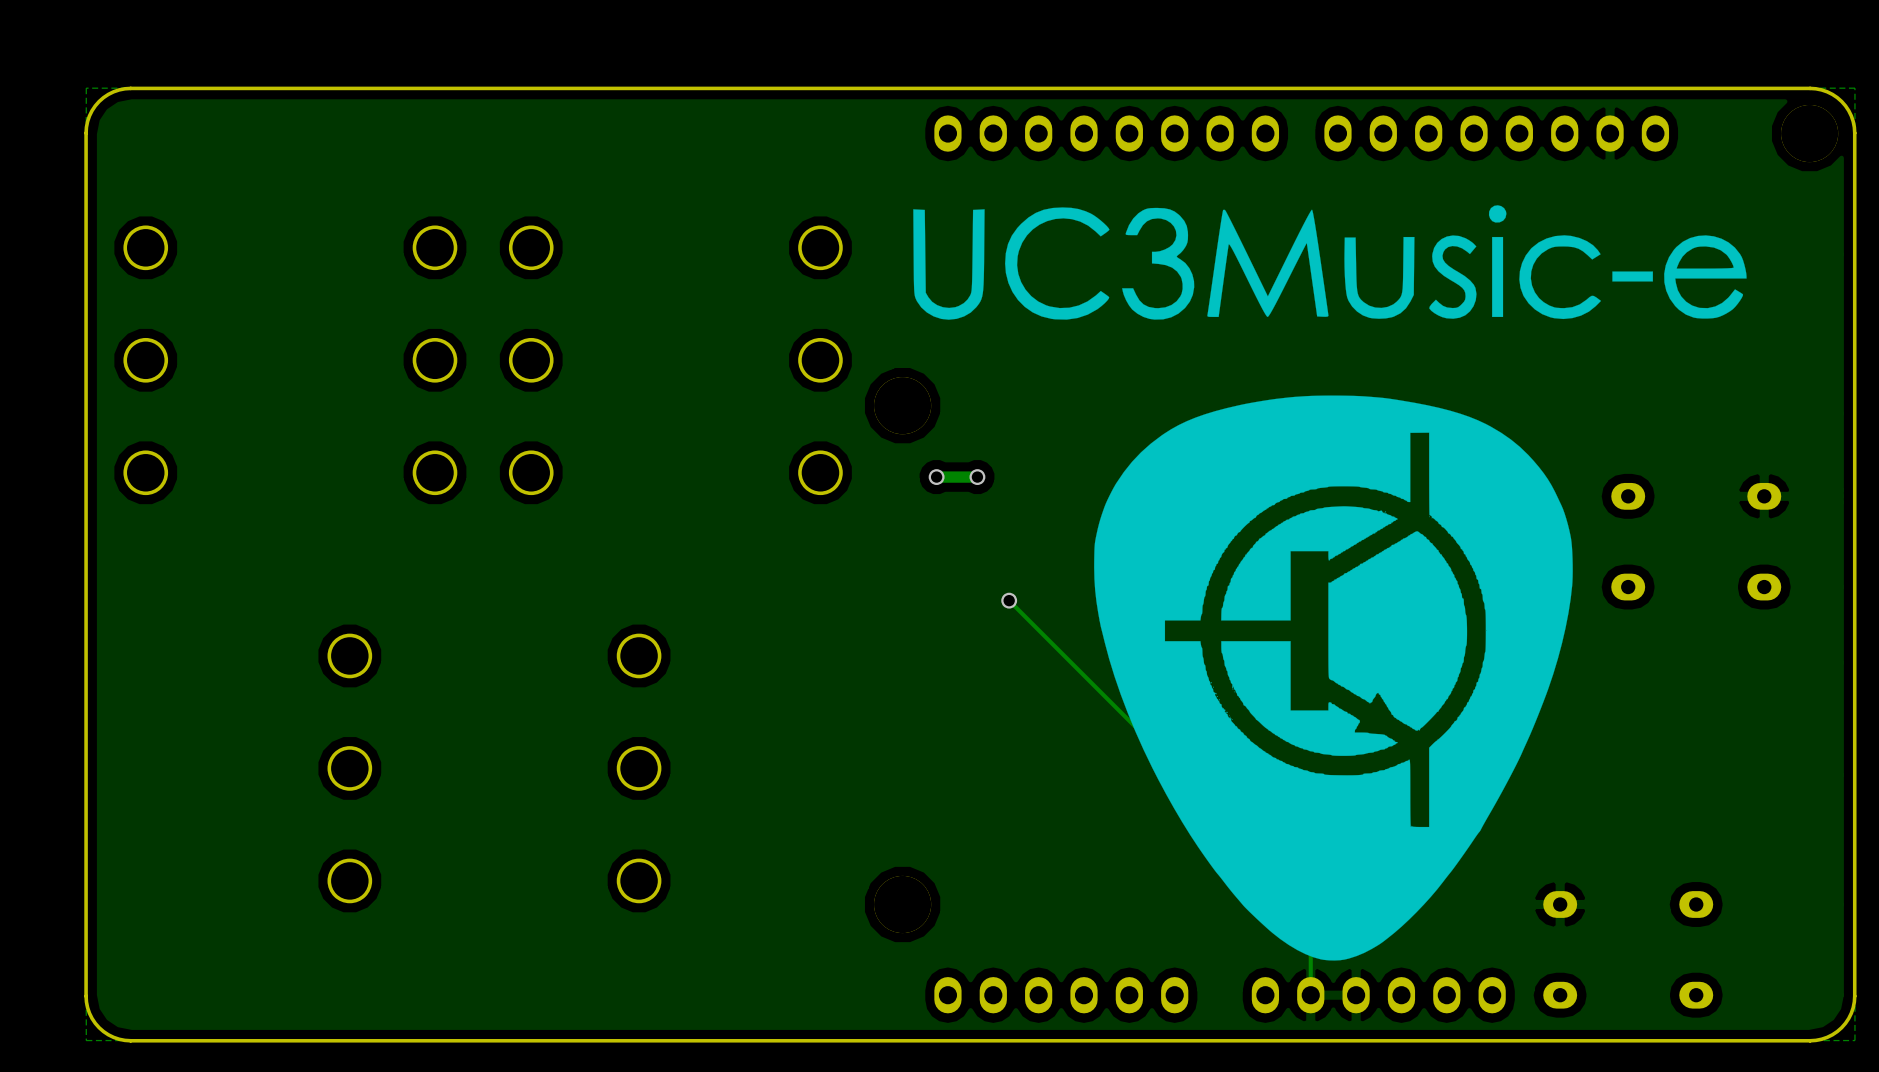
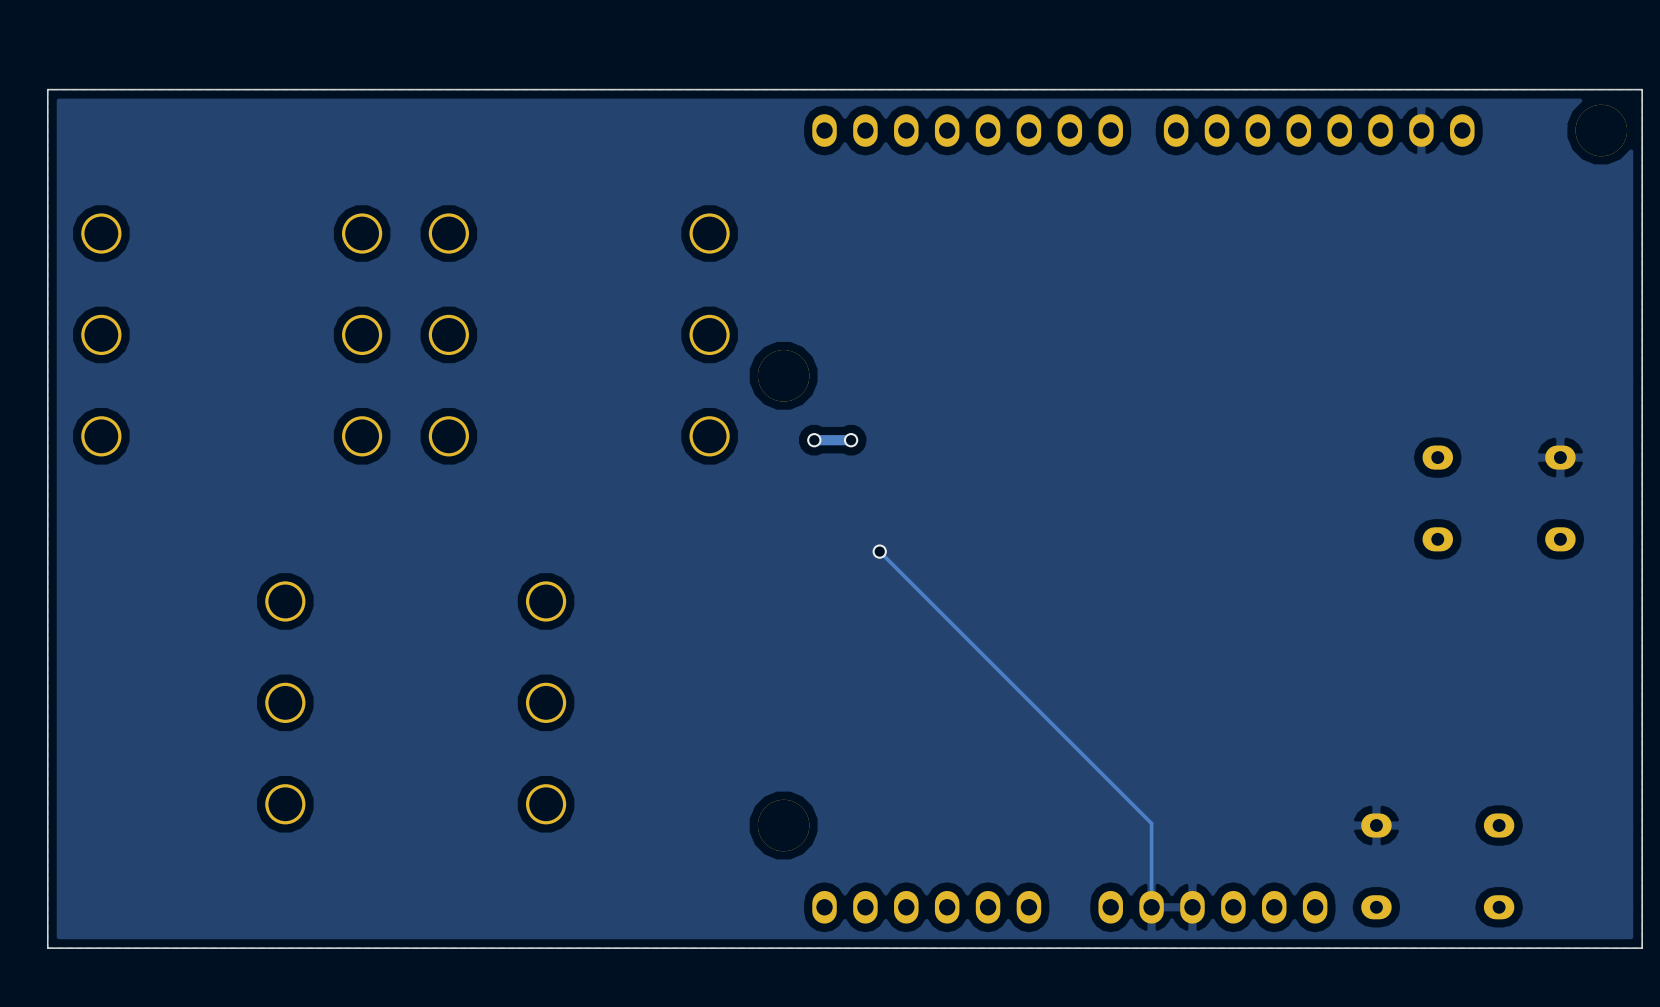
board edge: (1810, 88) (130, 88) (119, 89) (108, 94) (99, 101) (92, 110) (87, 121) (86, 133) (86, 996) (87, 1007) (92, 1018) (99, 1027) (108, 1034) (119, 1039) (130, 1040) (1810, 1040) (1821, 1039) (1832, 1034) (1841, 1027) (1848, 1018) (1853, 1007) (1854, 996) (1854, 133) (1851, 115) (1841, 101) (1827, 91) (1810, 88) -> (1642, 89) (1642, 948) (47, 948) (47, 89) (1642, 89)
drawing: [913, 205, 1747, 320] -> none
drawing: [1094, 395, 1573, 961] -> none

